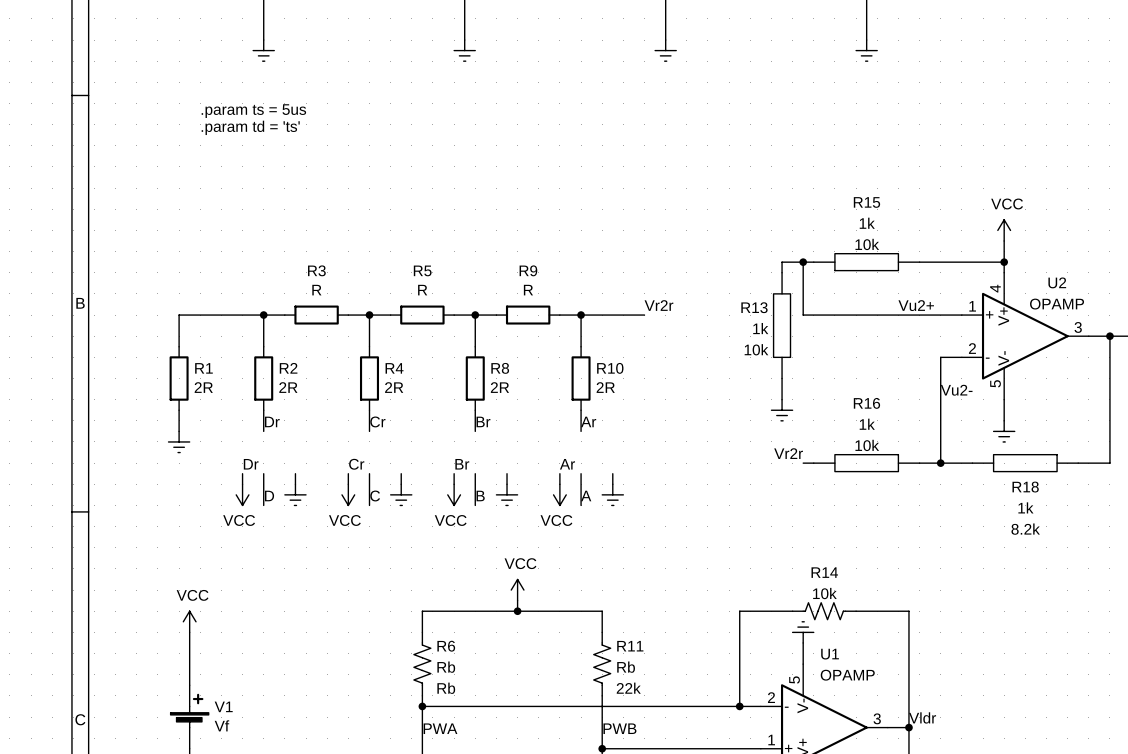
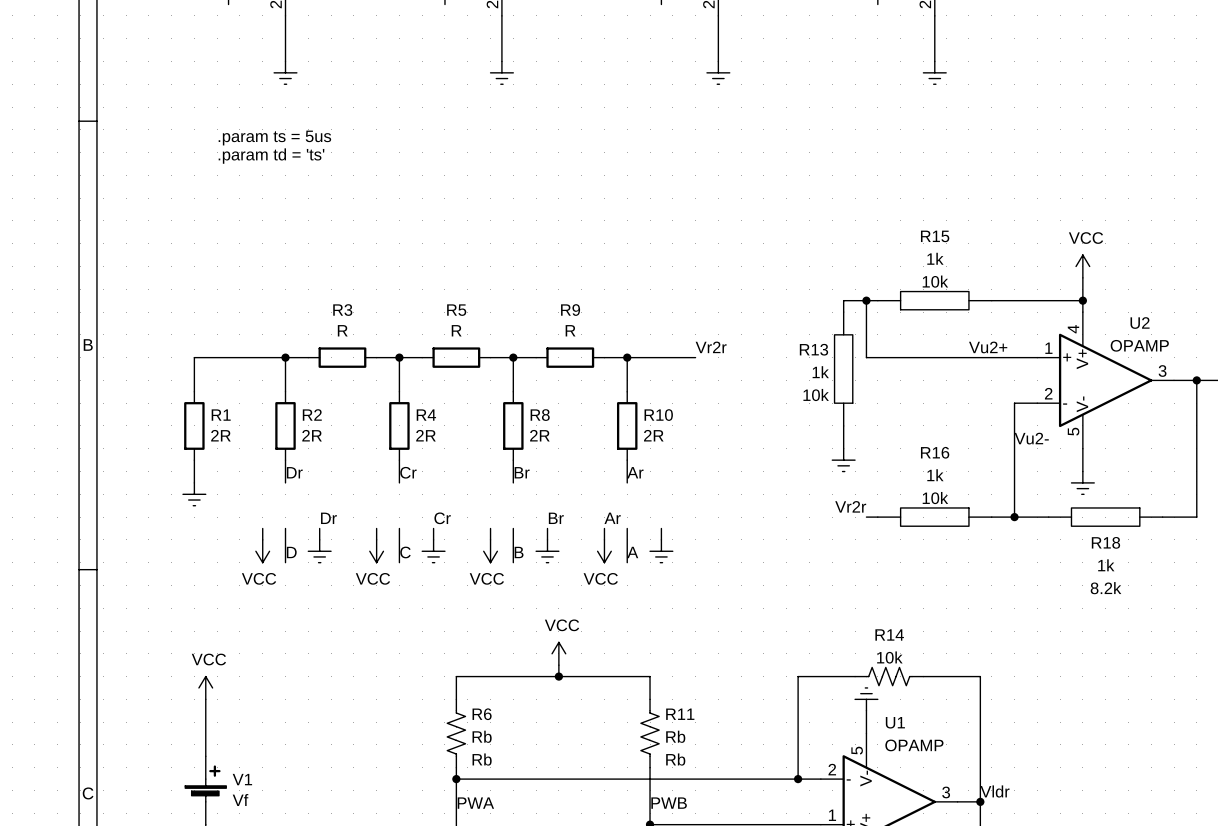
label position: Dr (251, 464) -> Dr (328, 518)
label position: Cr (356, 464) -> Cr (442, 518)
label position: Br (462, 464) -> Br (556, 518)
R11 text: 22k (628, 688) -> Rb (675, 759)

